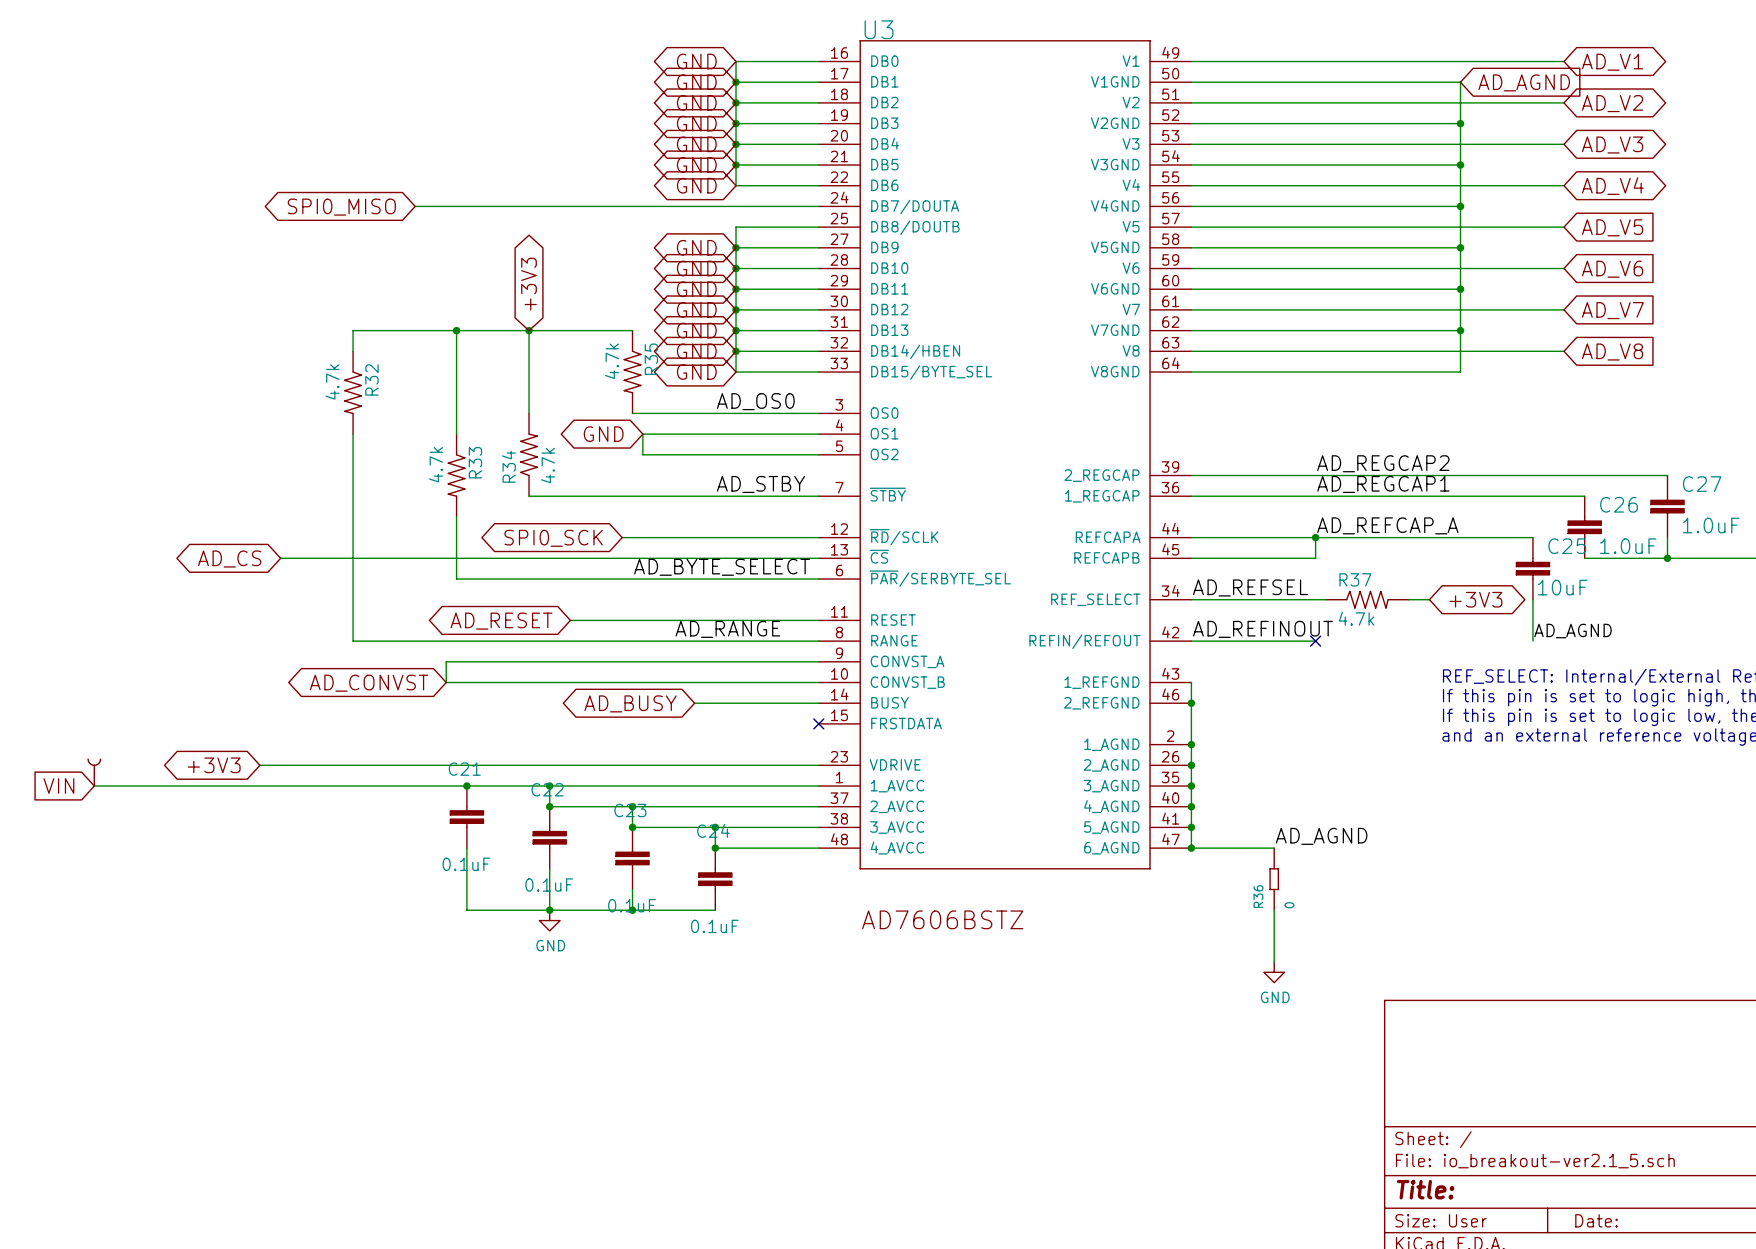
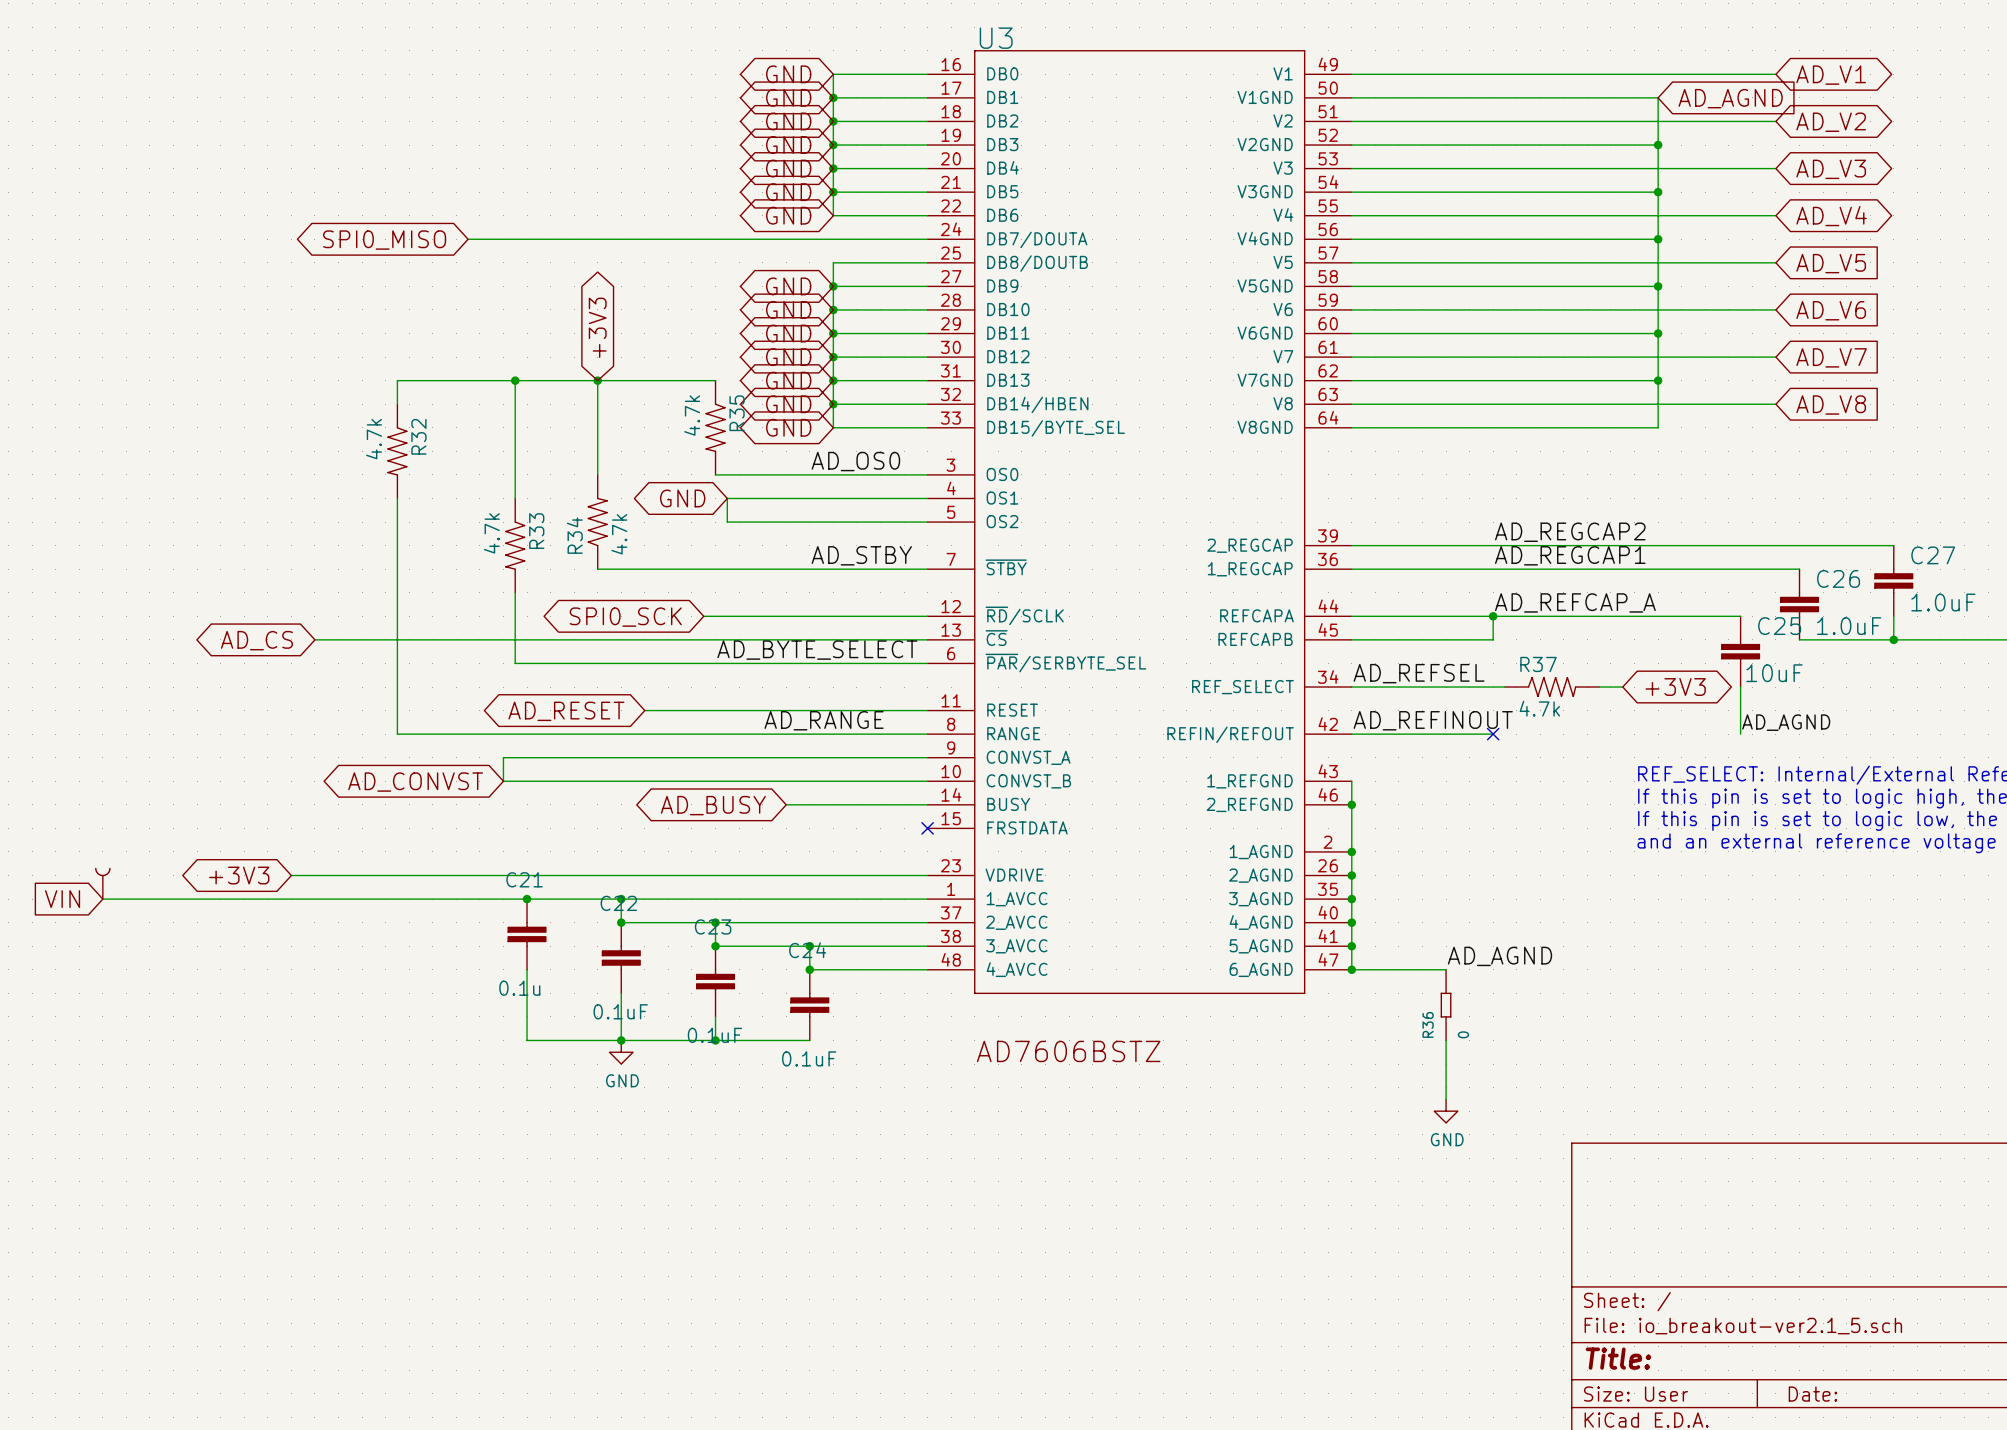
C21 value: 0.1uF (466, 864) -> 0.1u (519, 988)

